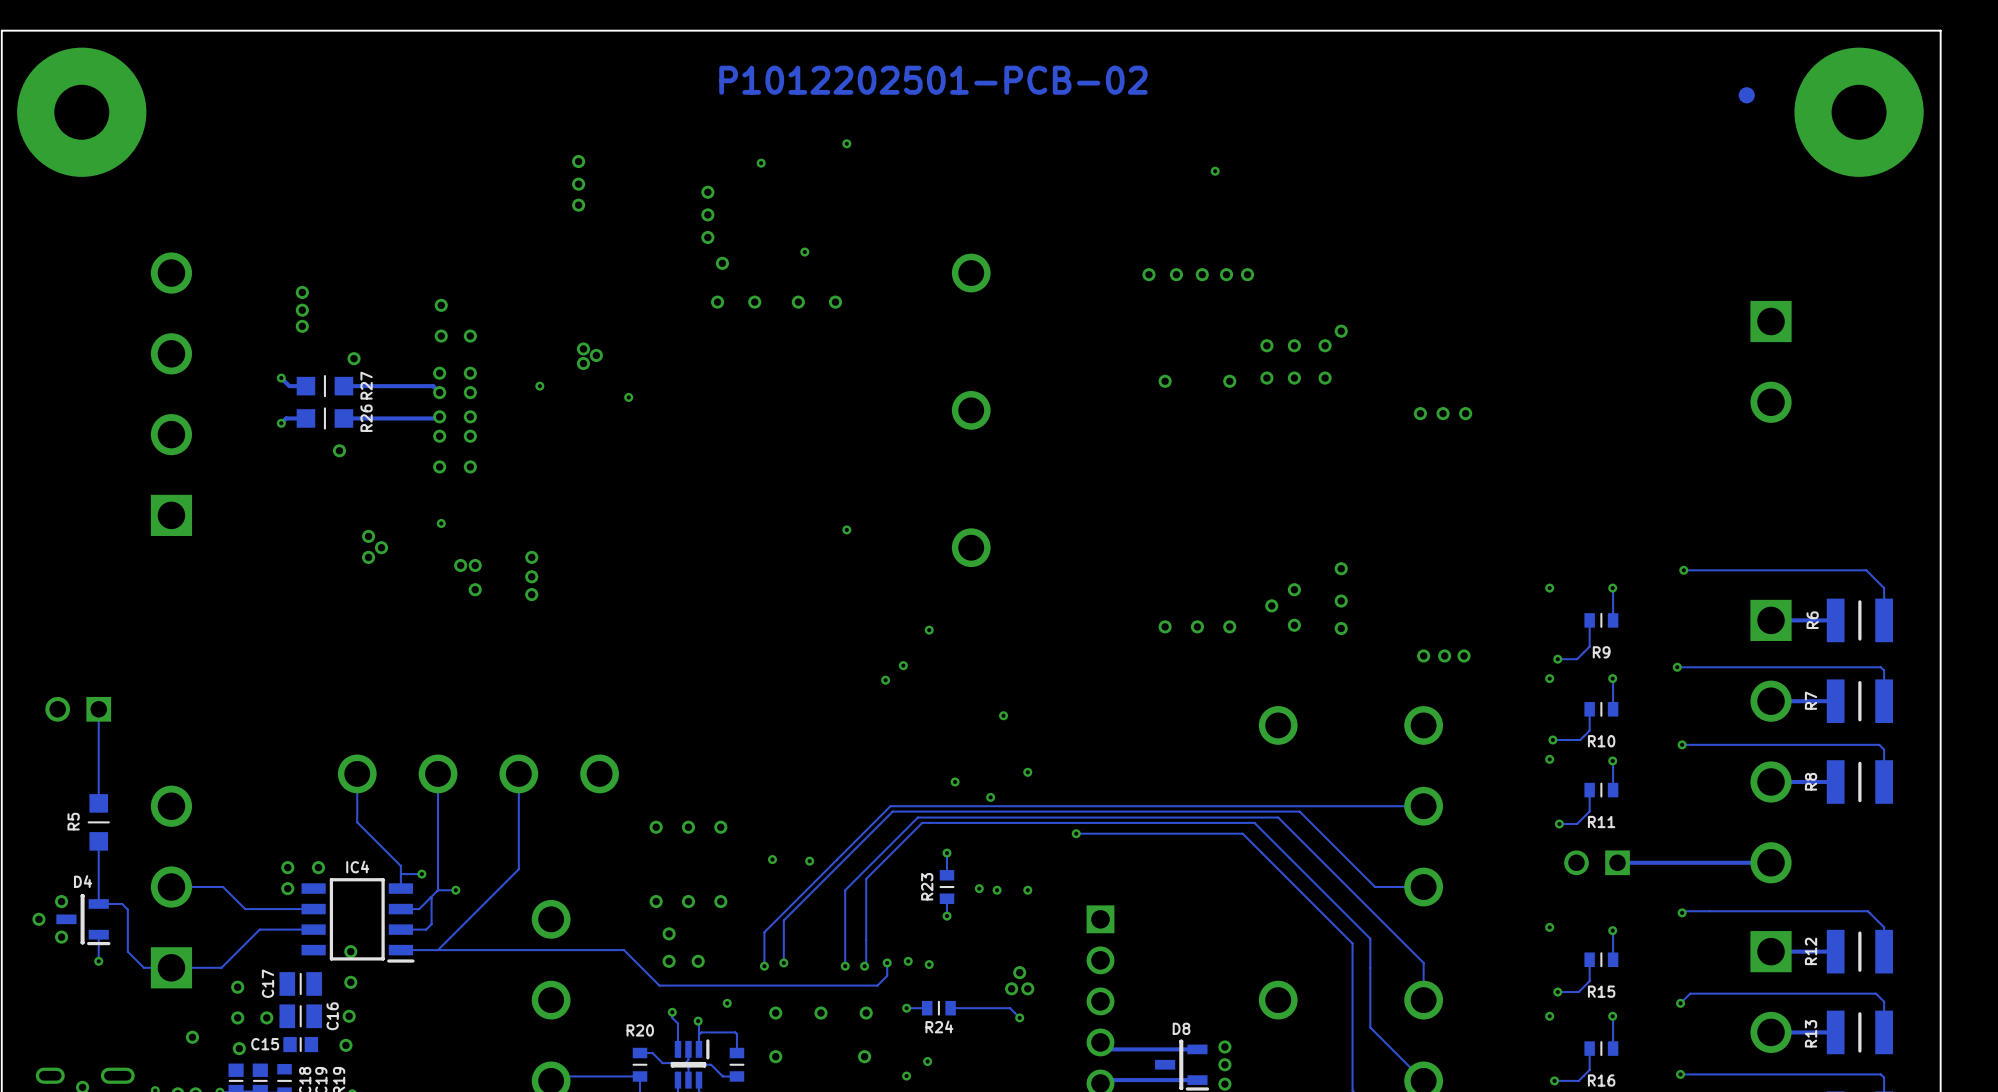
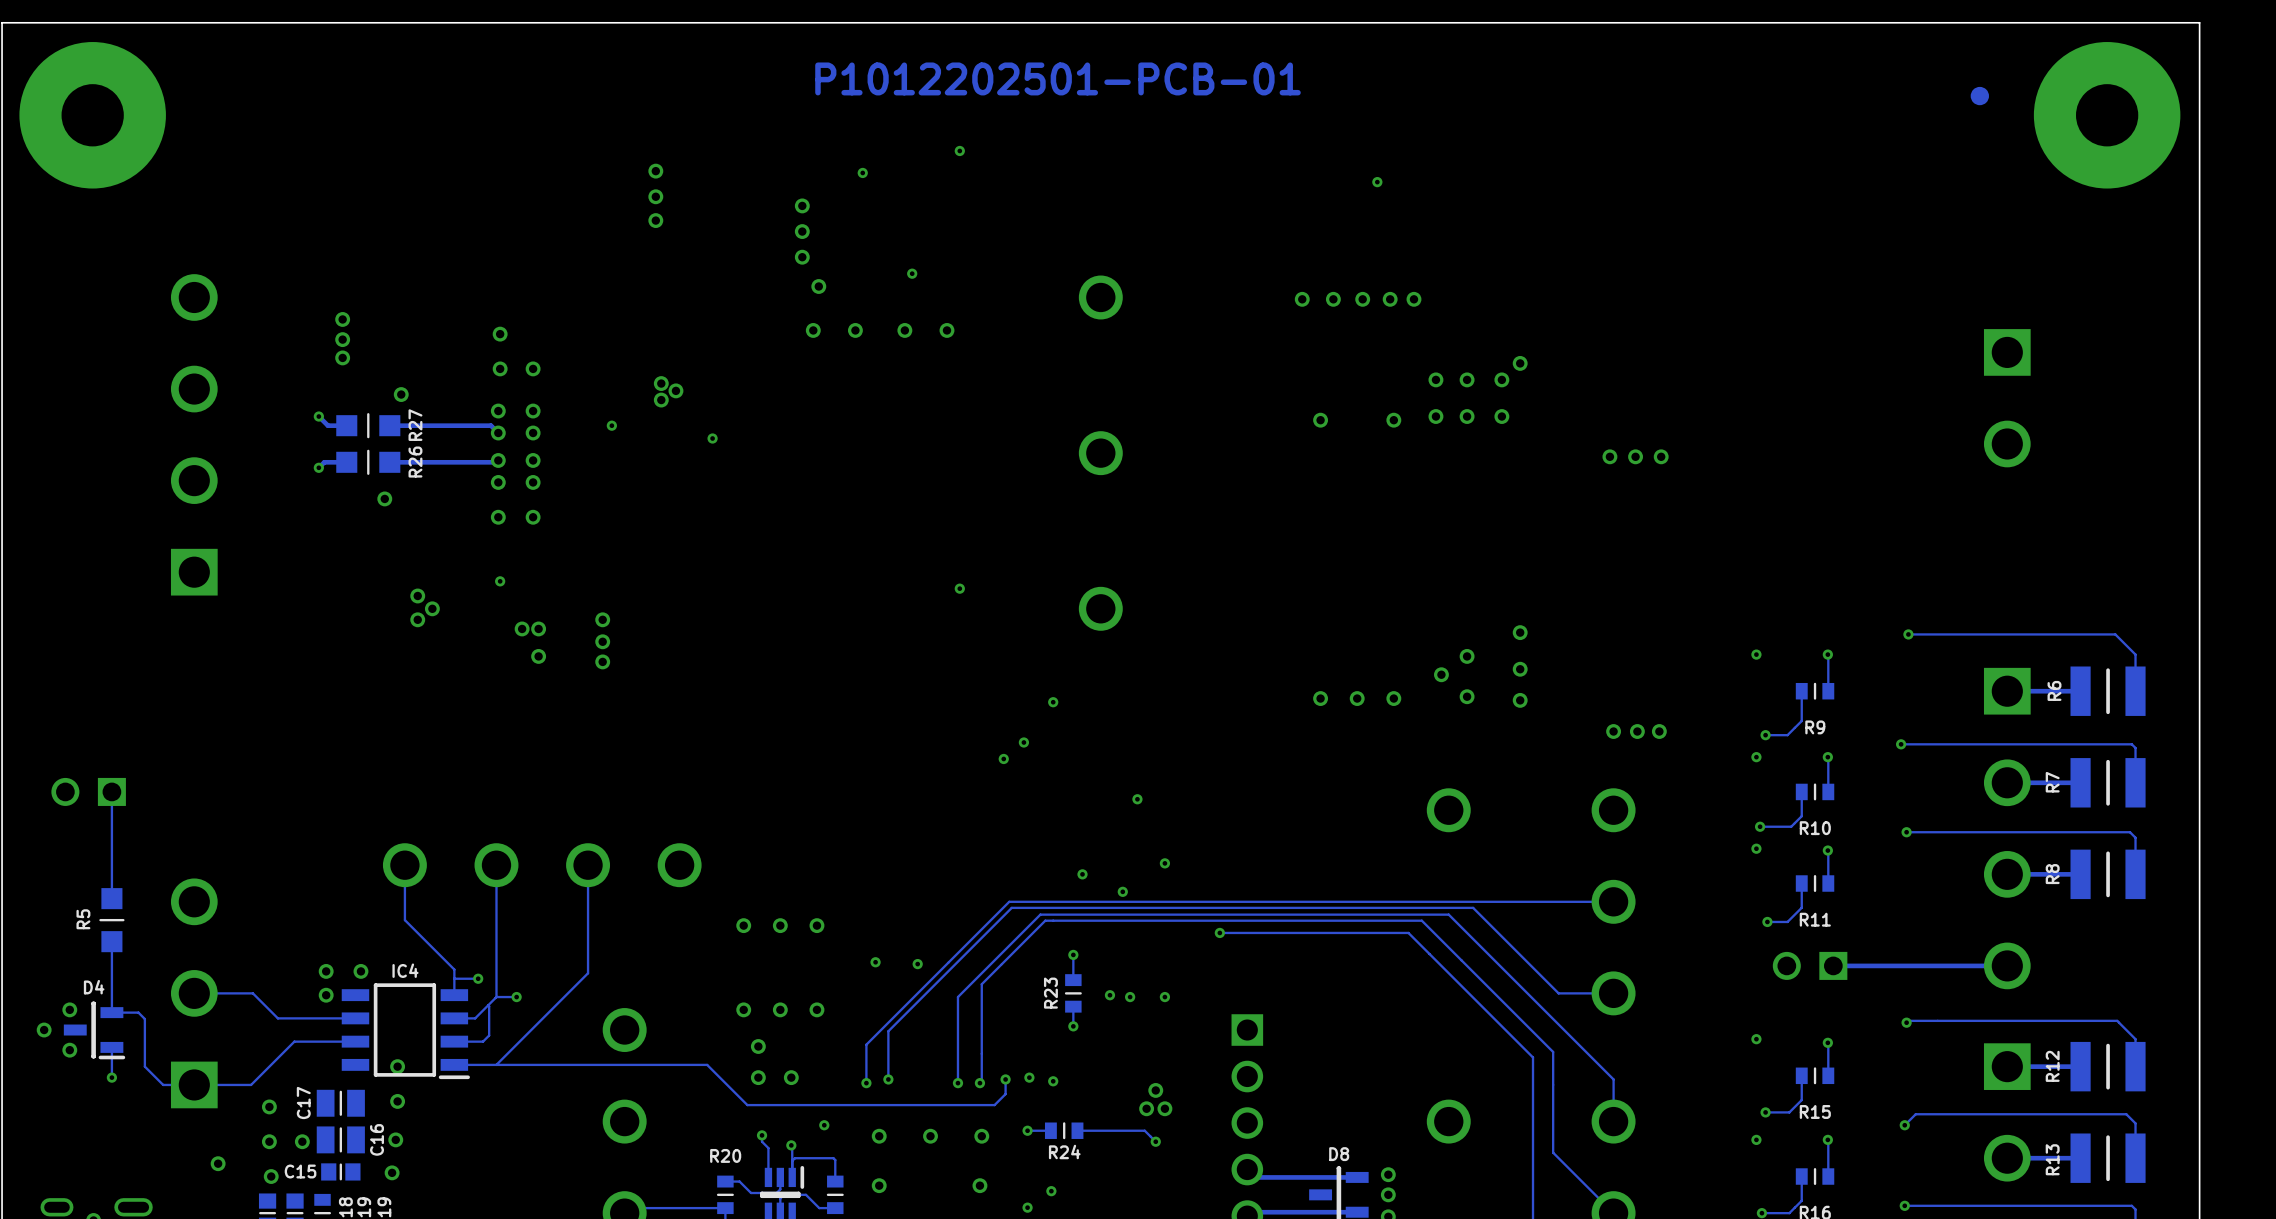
text: P1012202501-PCB-02 (933, 80) -> P1012202501-PCB-01 (1058, 78)

